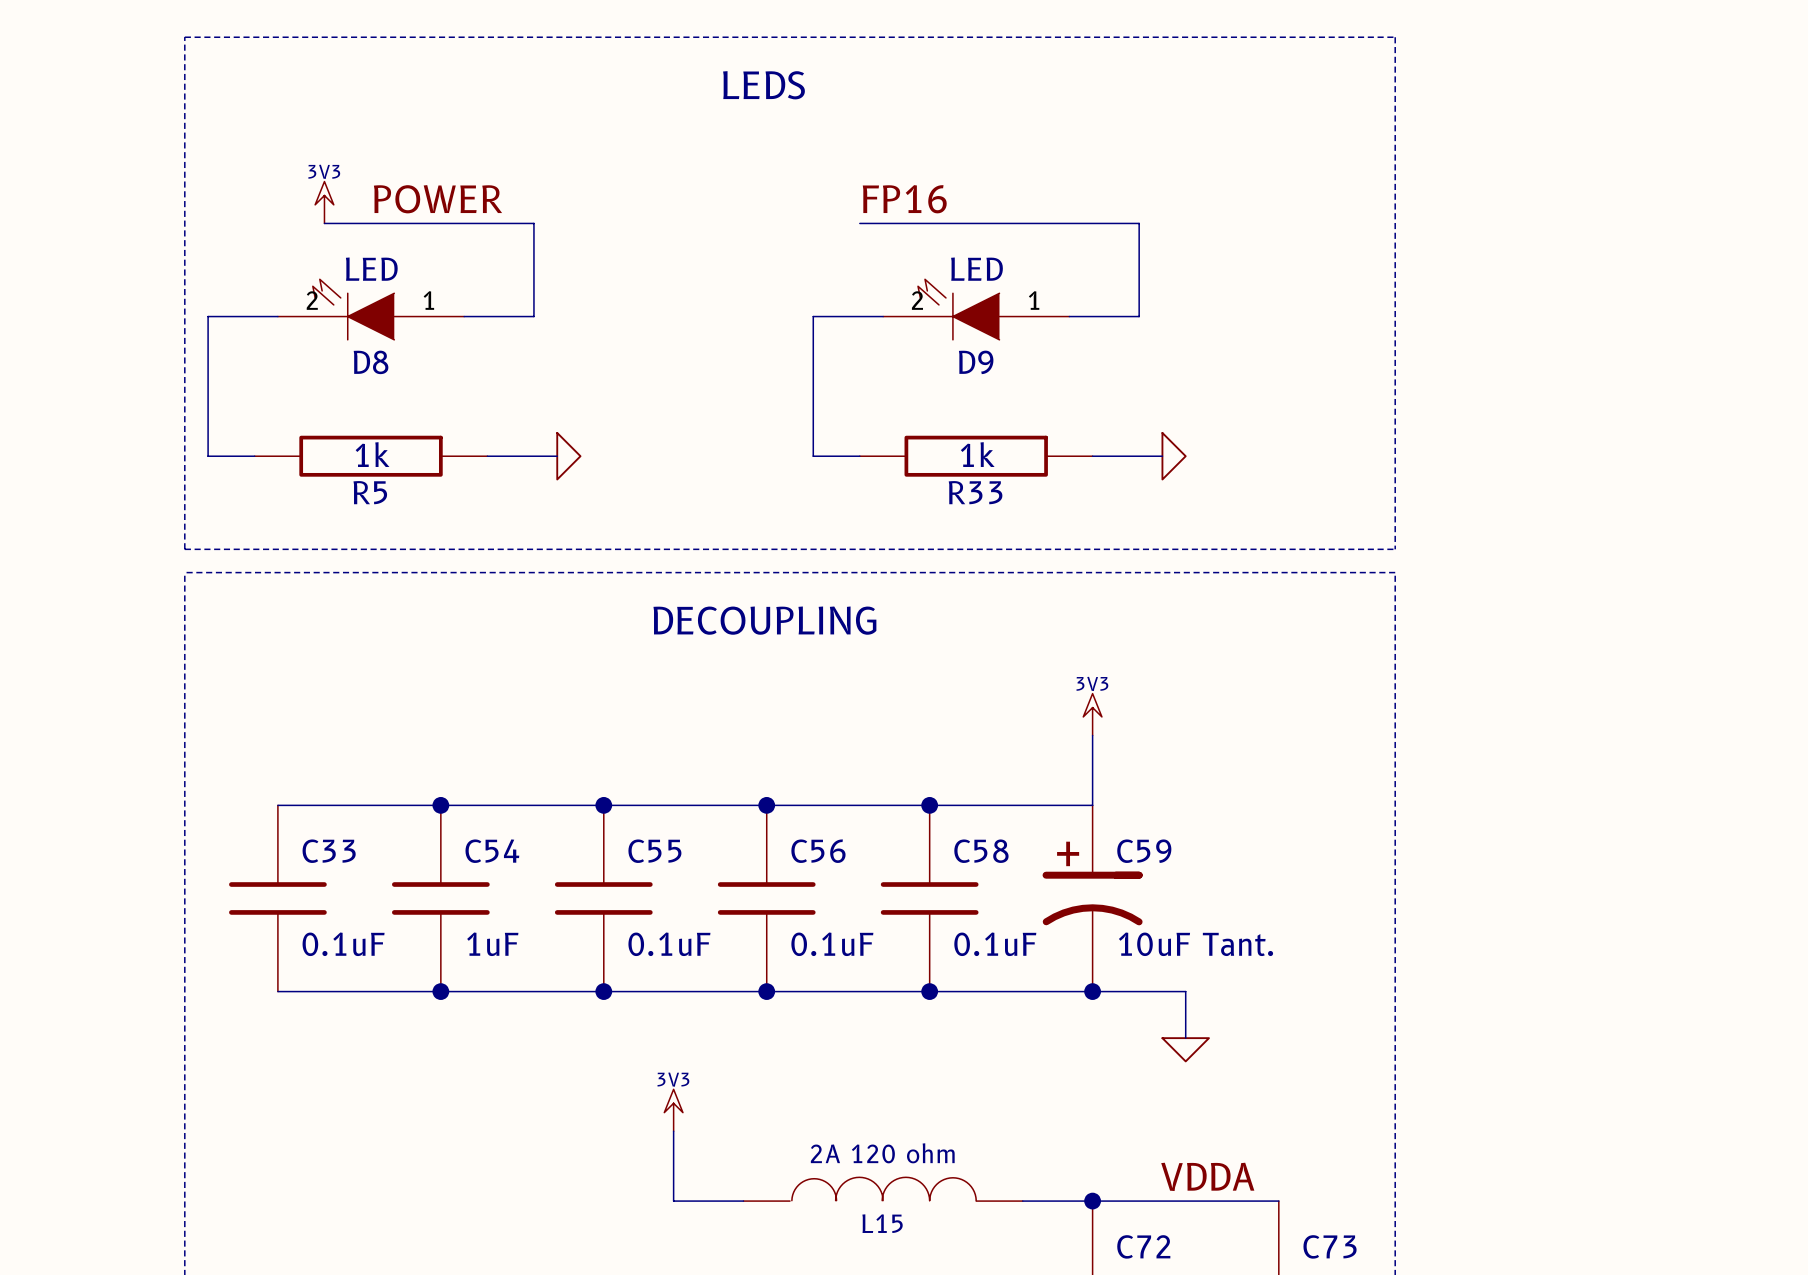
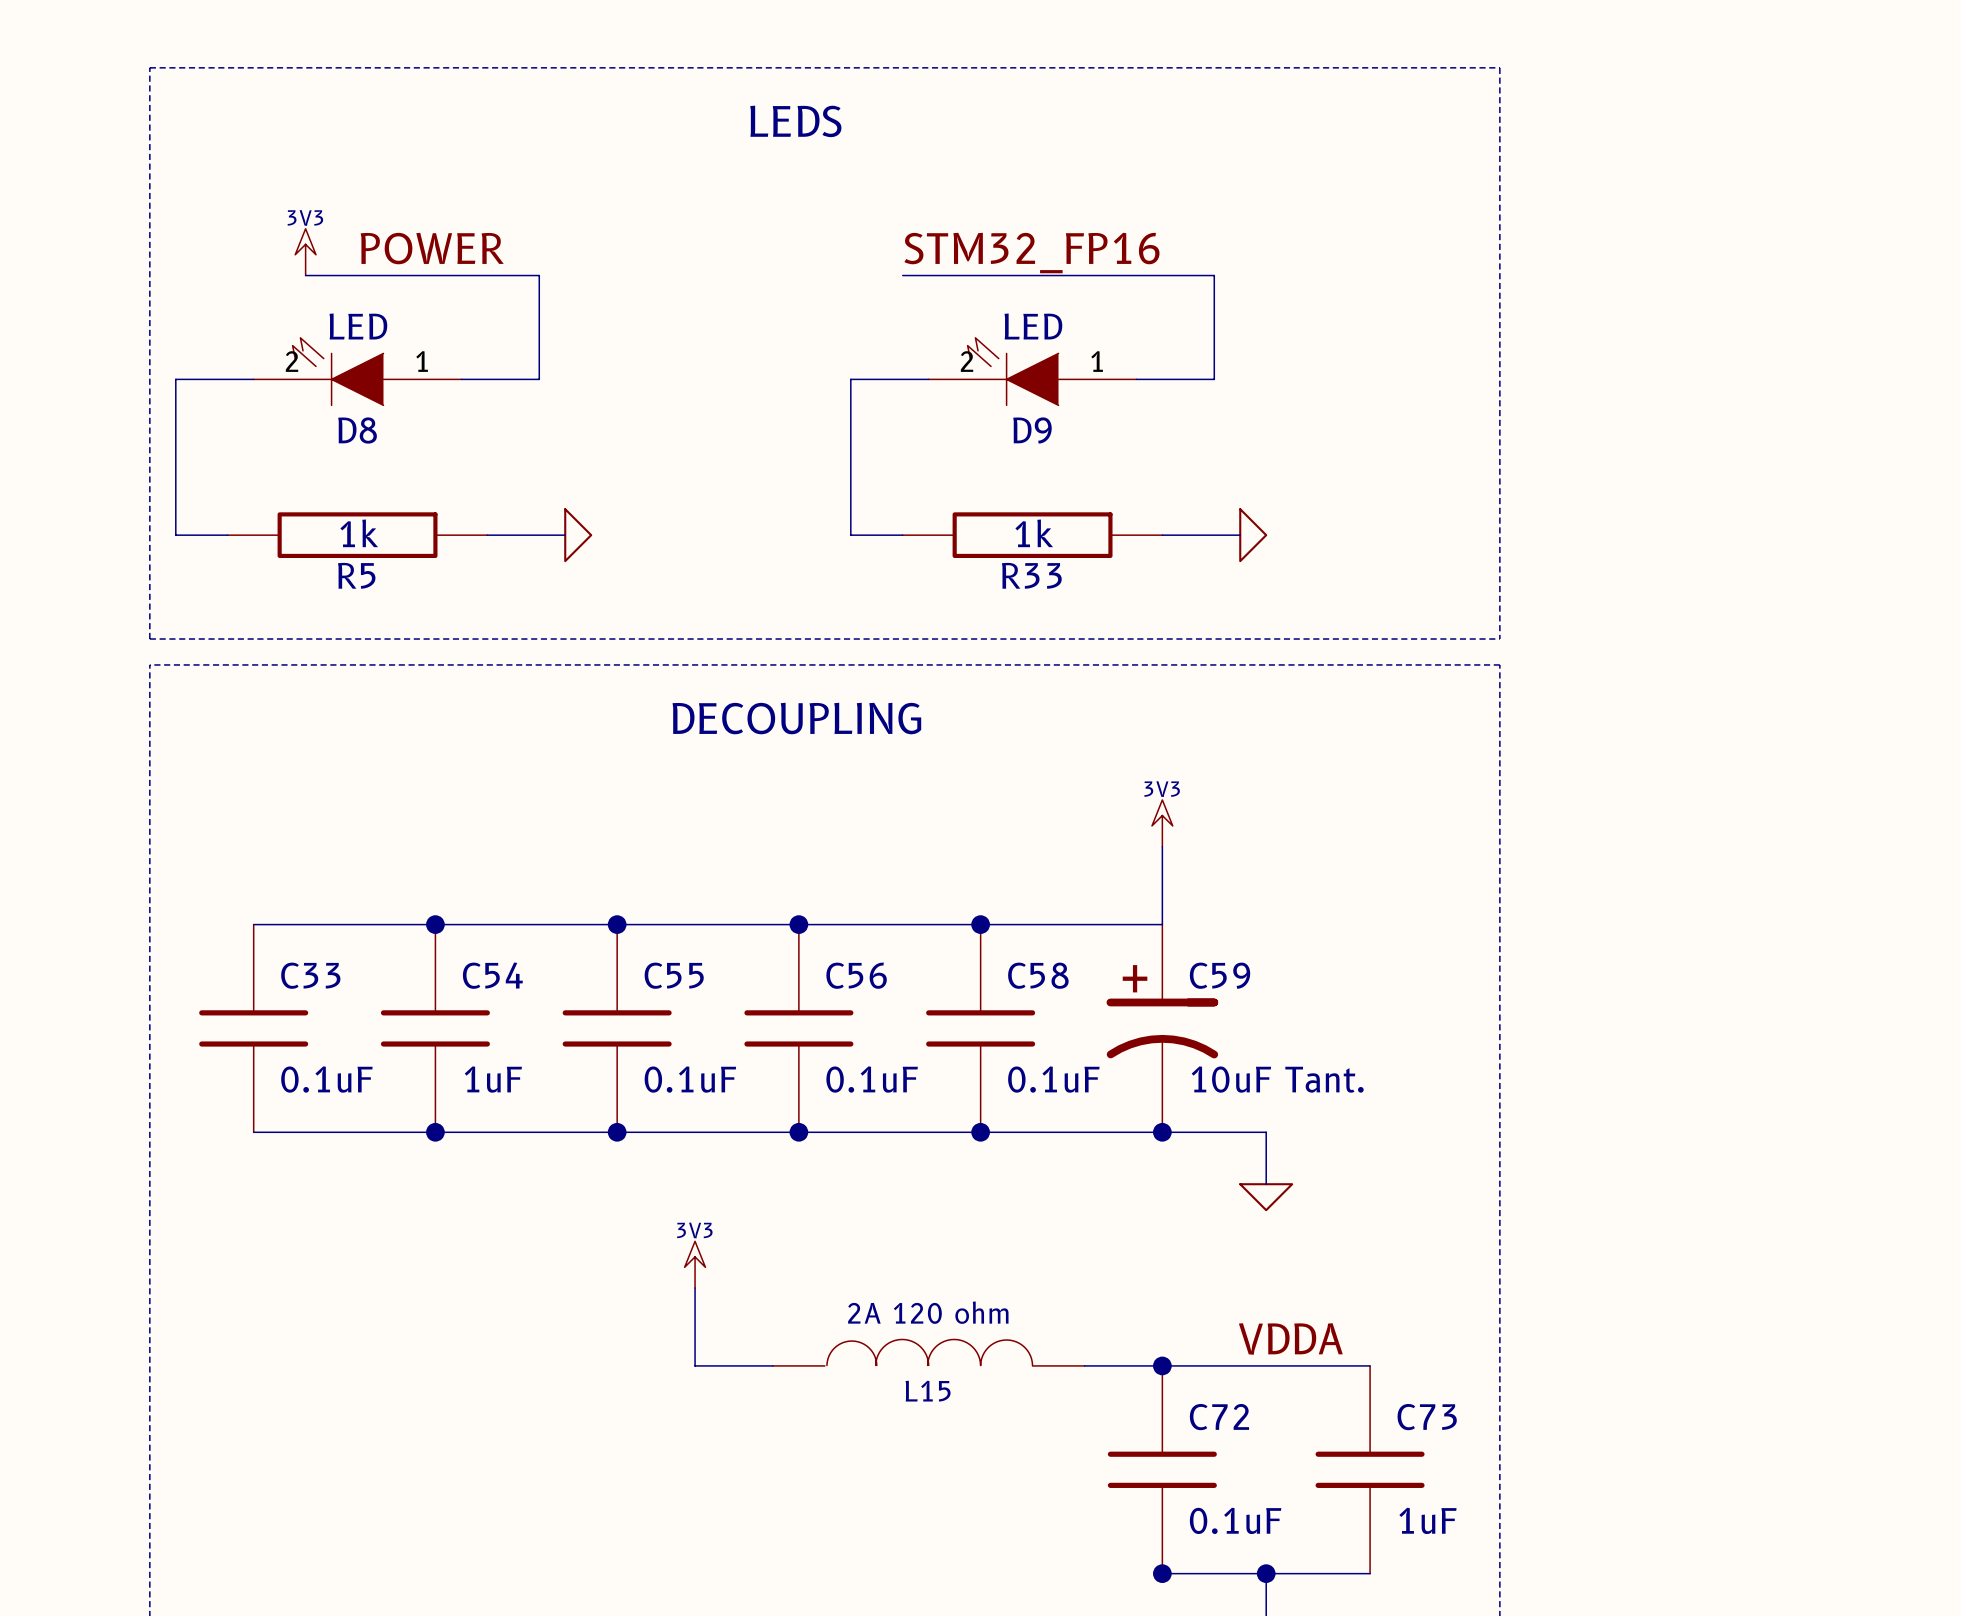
label: FP16 (904, 199) -> STM32_FP16 (1031, 253)

